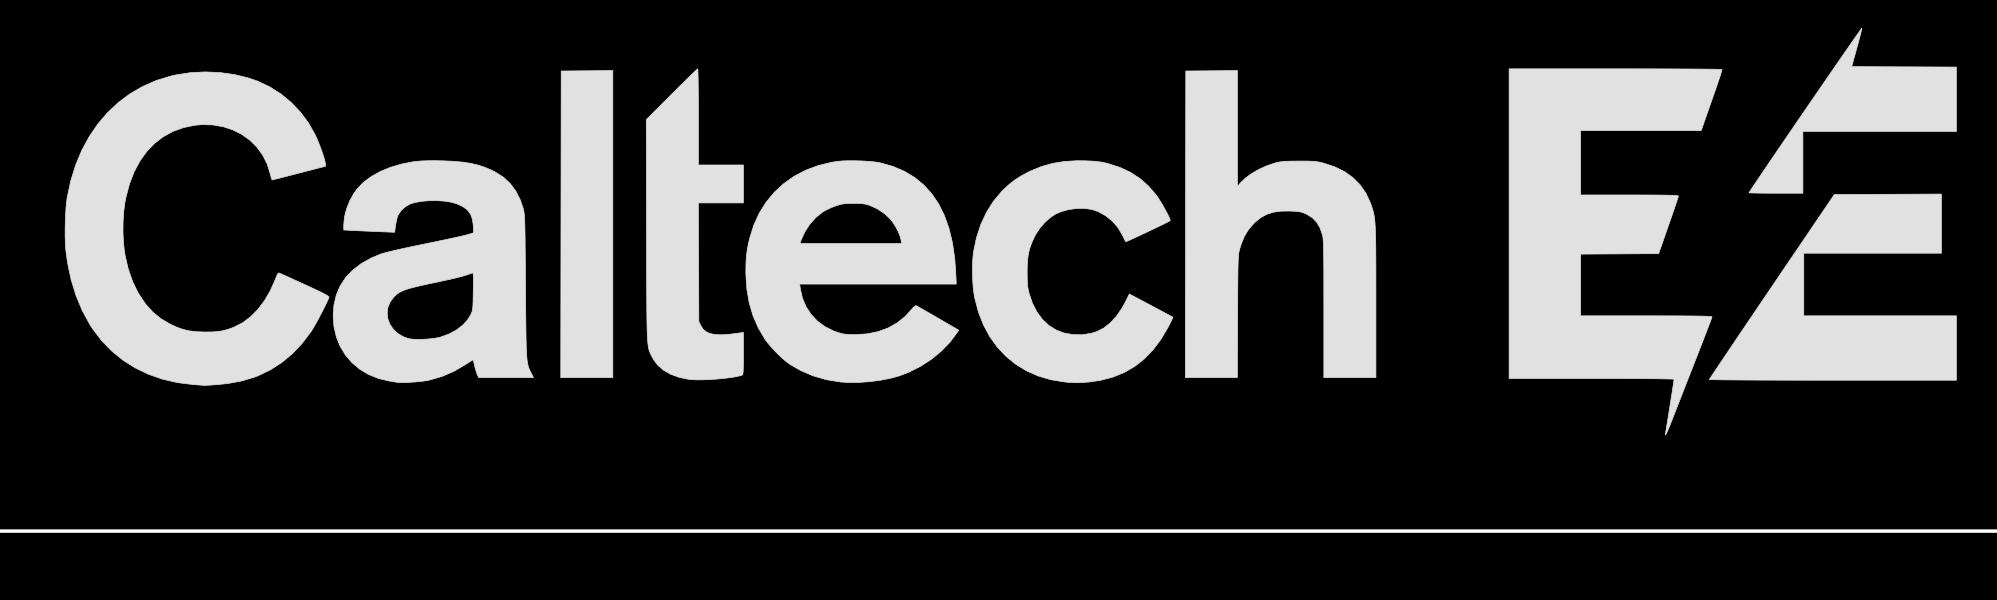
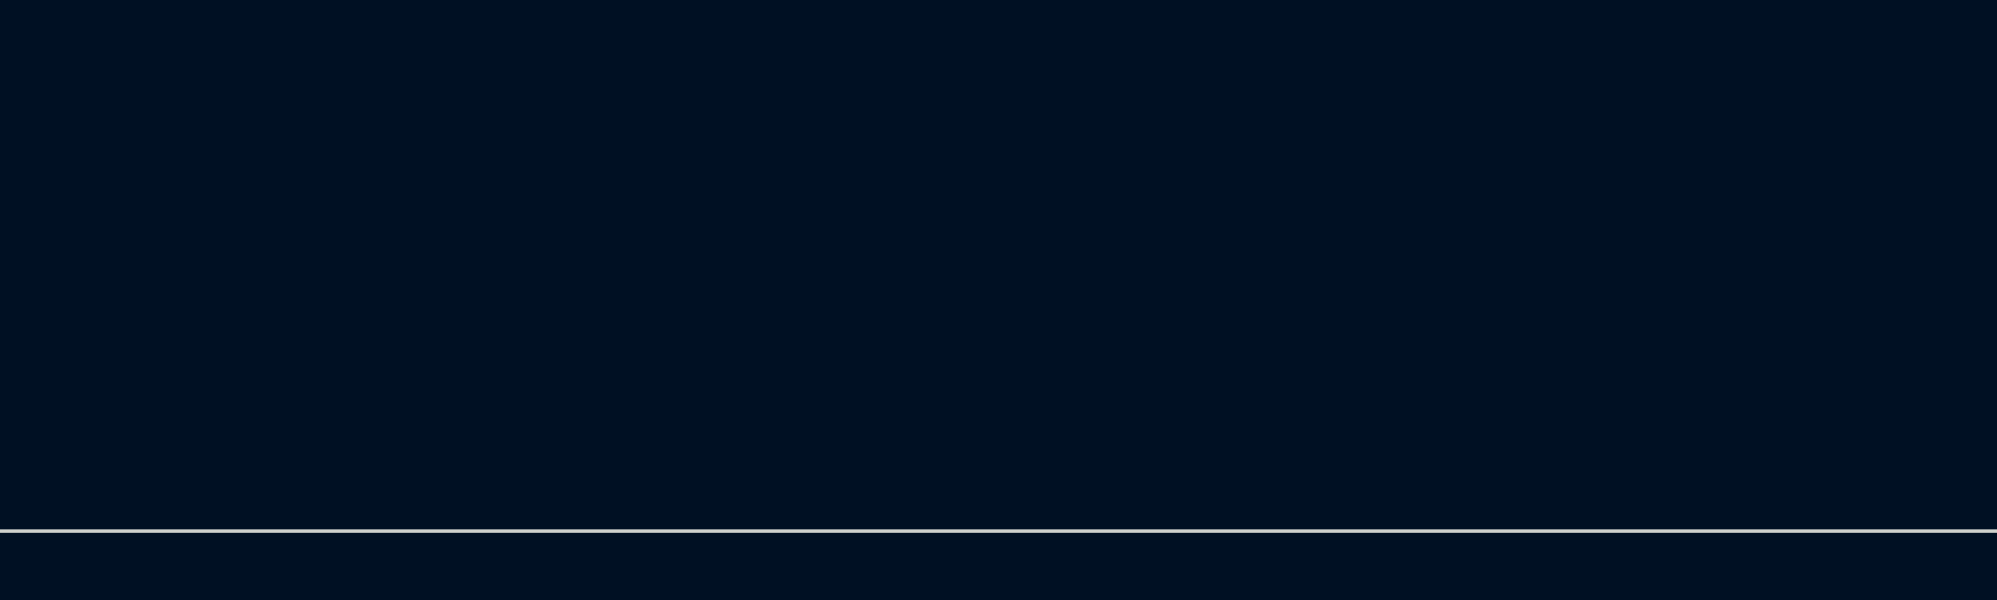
drawing: [64, 28, 1957, 436] -> none

